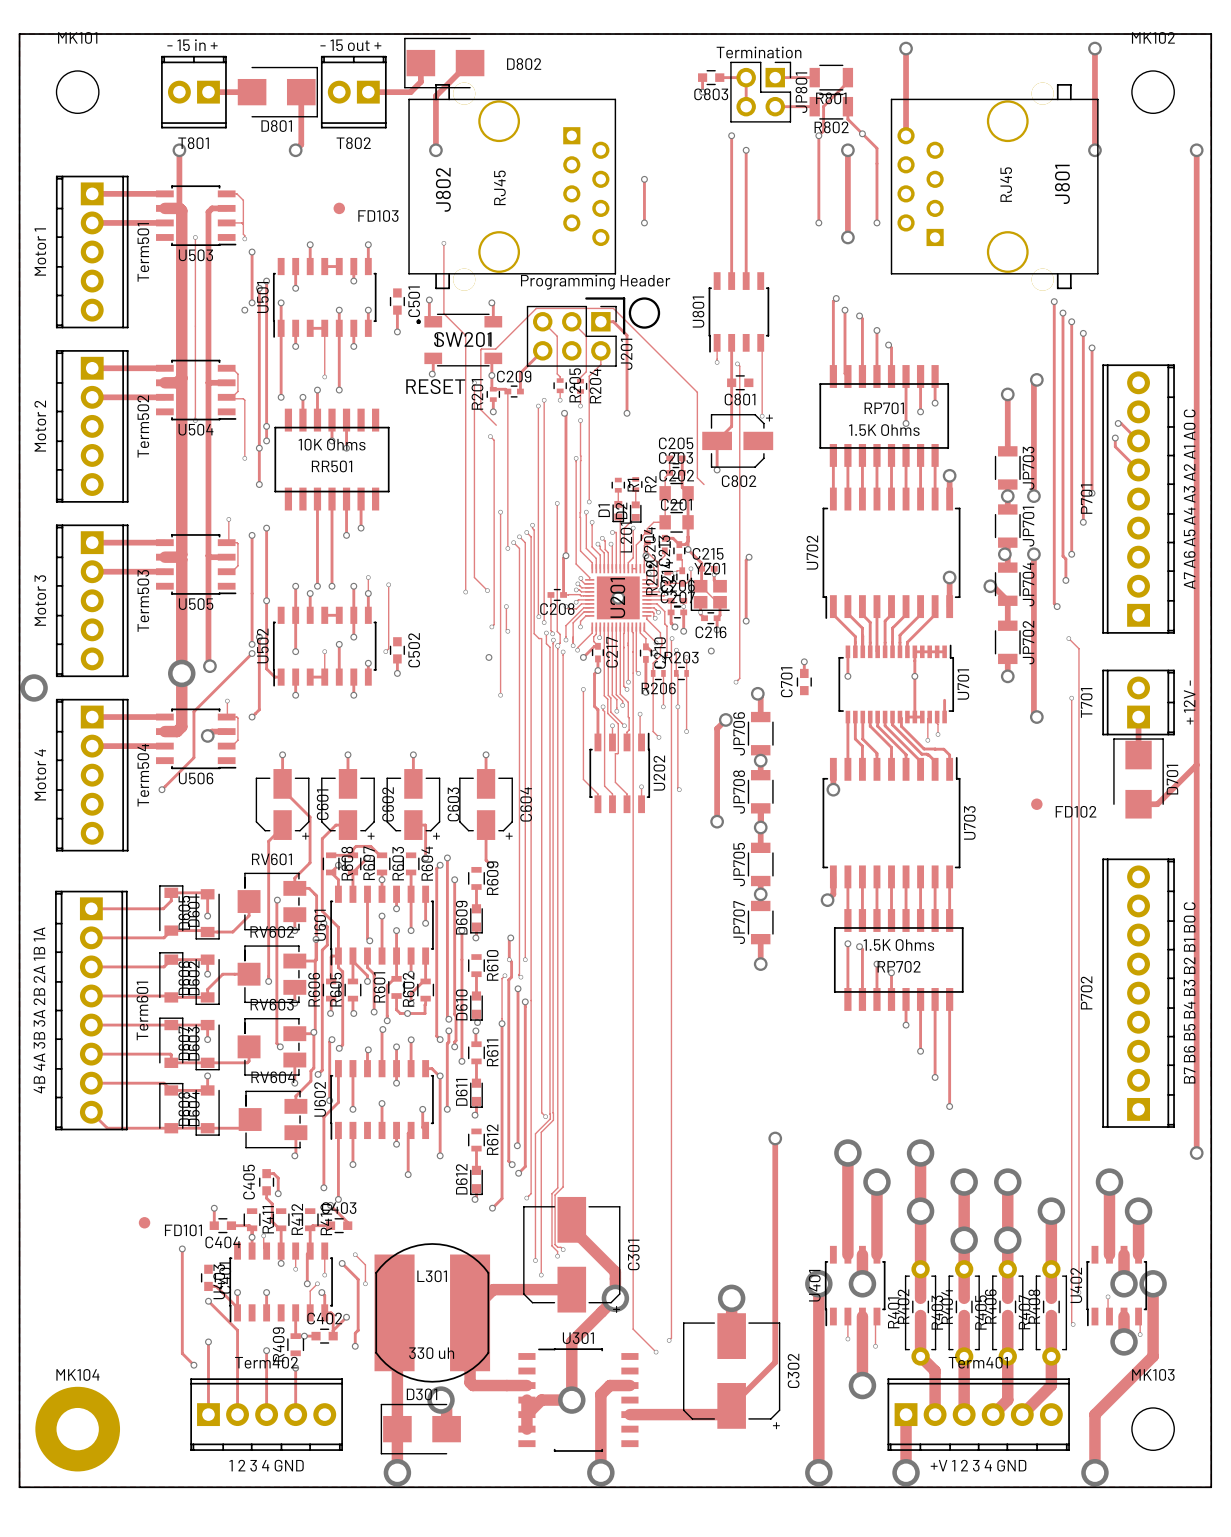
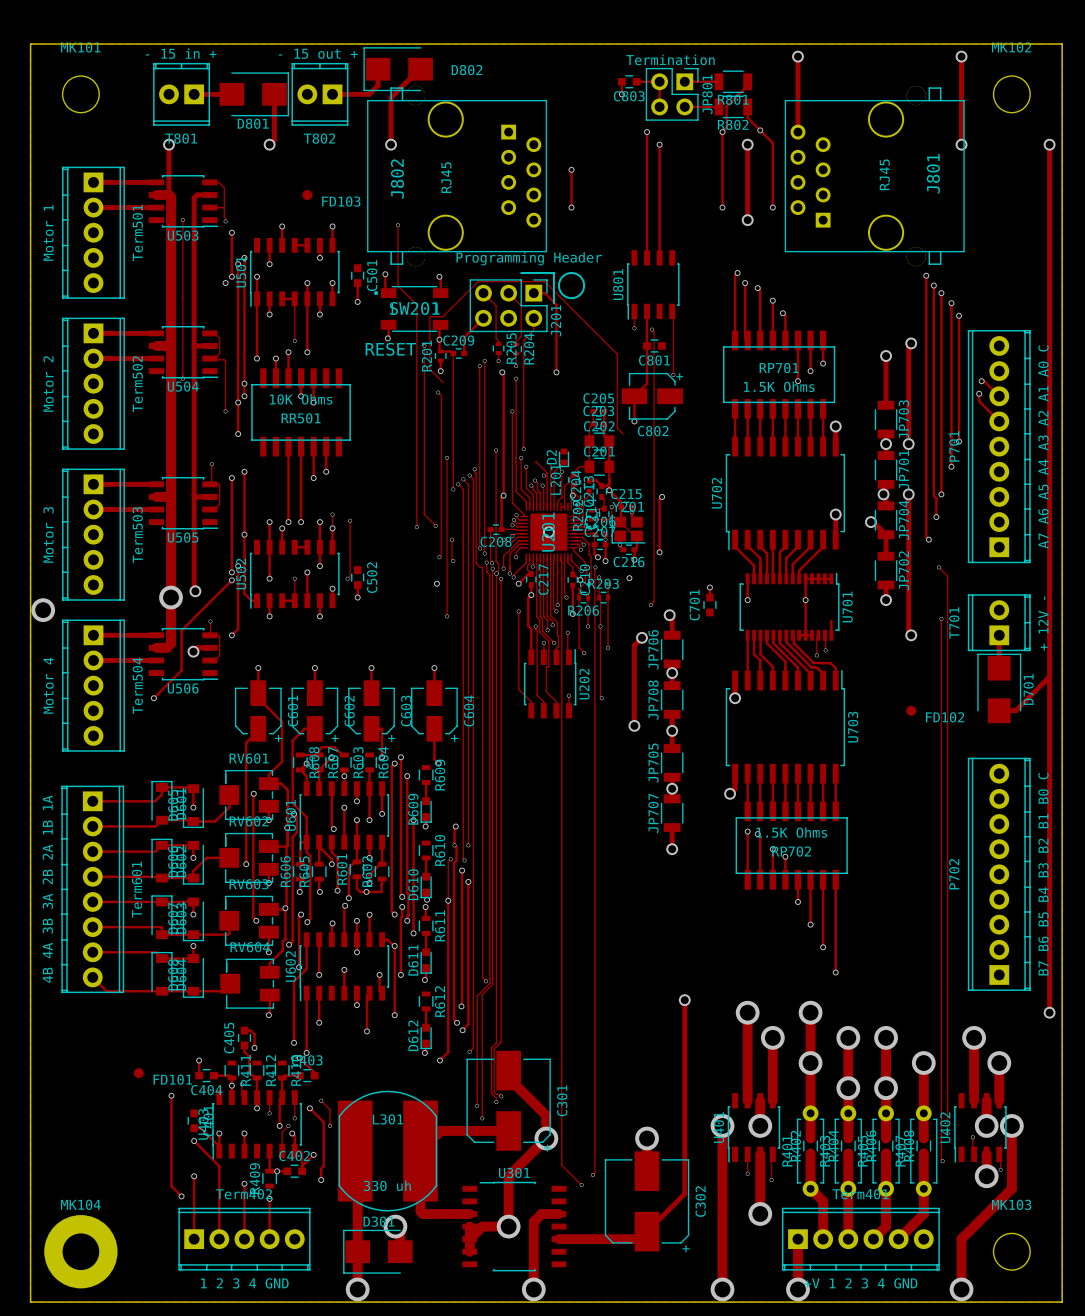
R2: (635, 484) -> none
R1: (618, 485) -> none
track: (635, 489) (635, 504) -> none
track: (618, 490) (618, 504) -> none
D1: (618, 511) -> none
track: none -> (535, 461) (547, 472) (547, 475)

